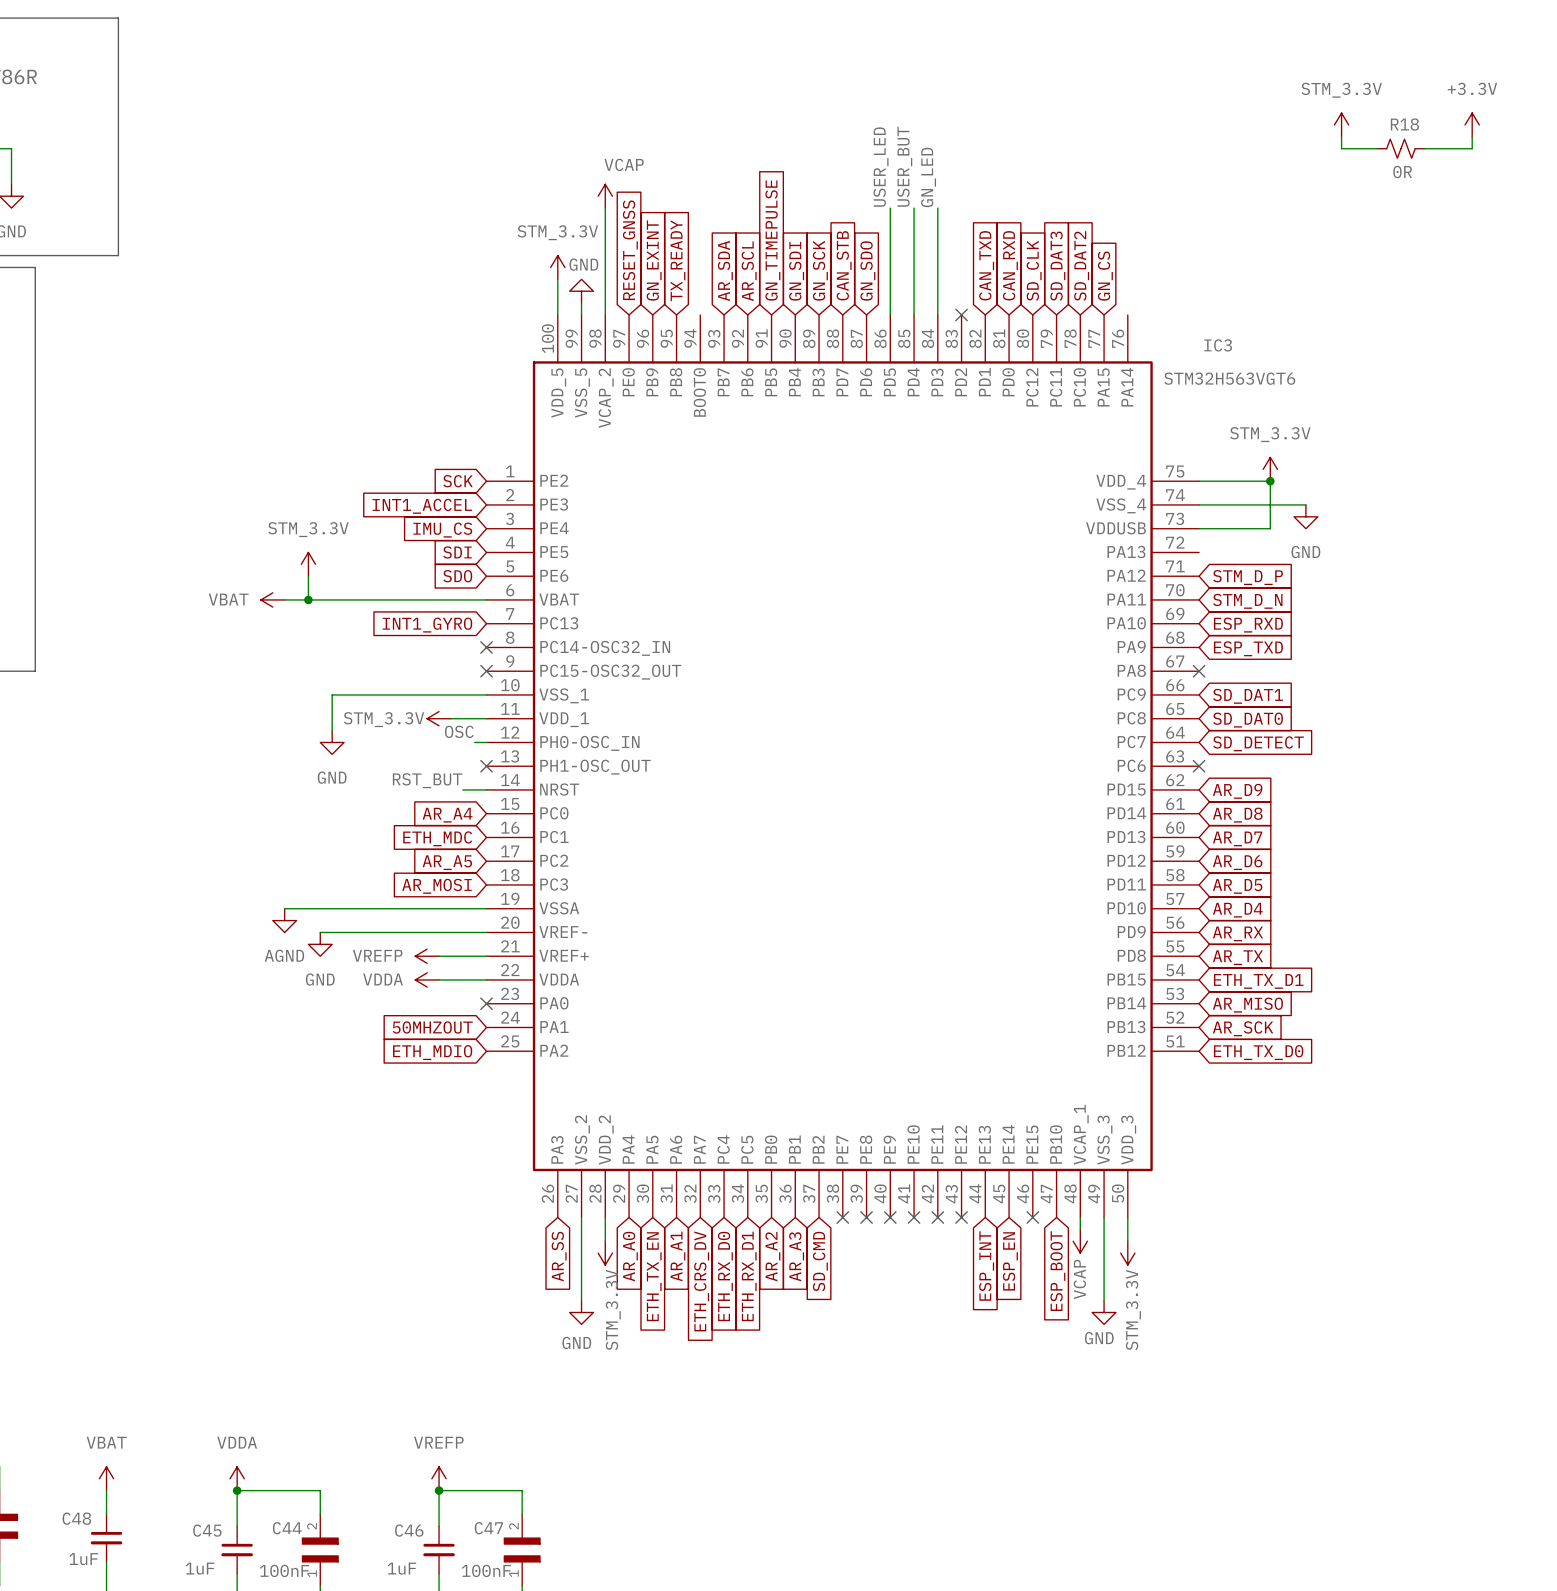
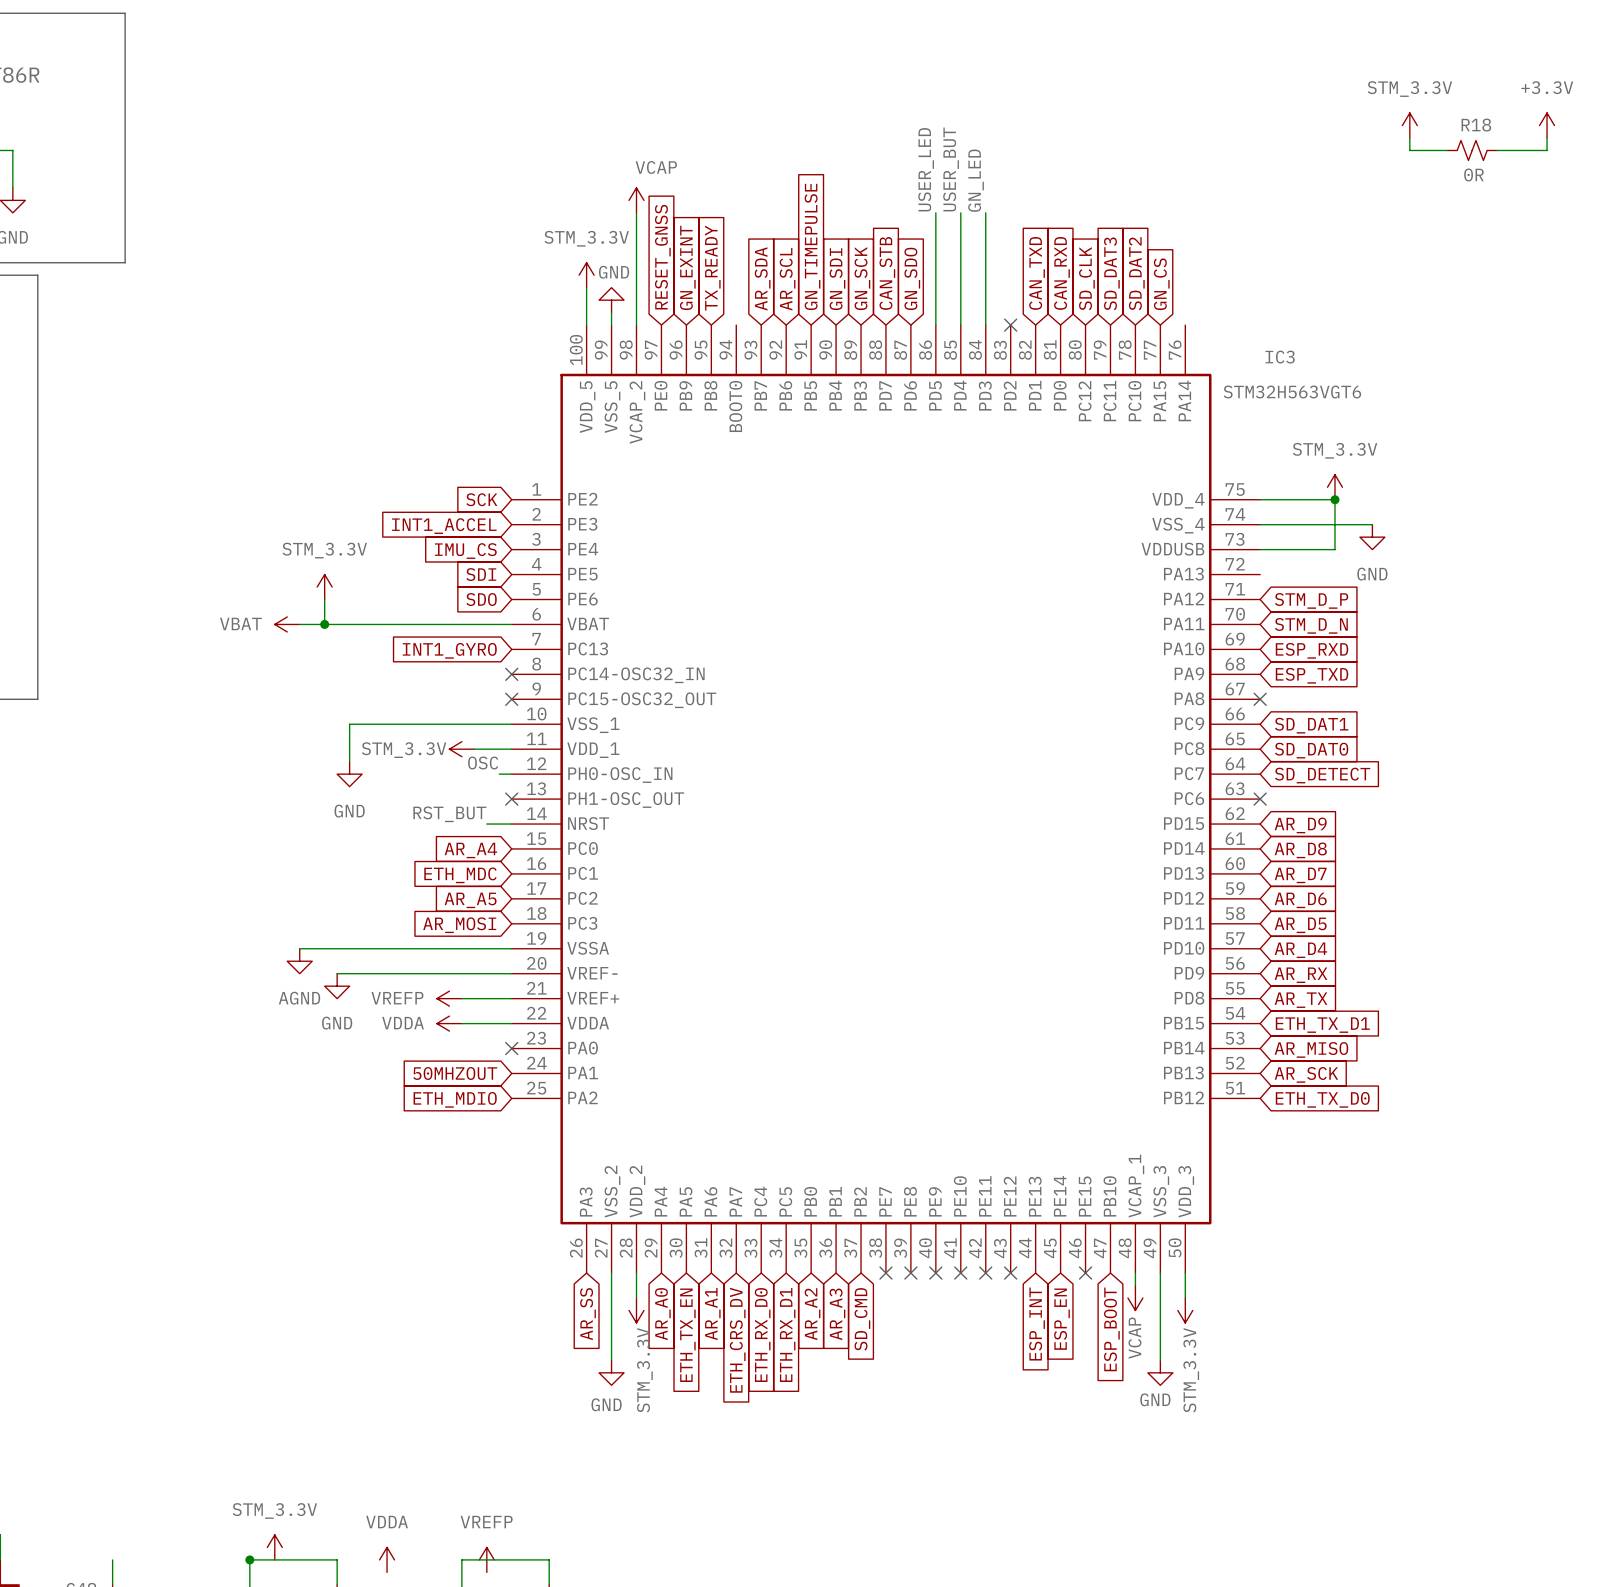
power symbol: VBAT (106, 1478) -> none
power symbol position: VDDA (237, 1478) -> VDDA (387, 1559)
power symbol: none -> STM_3.3V (274, 1547)
power symbol position: VREFP (439, 1478) -> VREFP (486, 1559)
junction: (439, 1490) -> none

